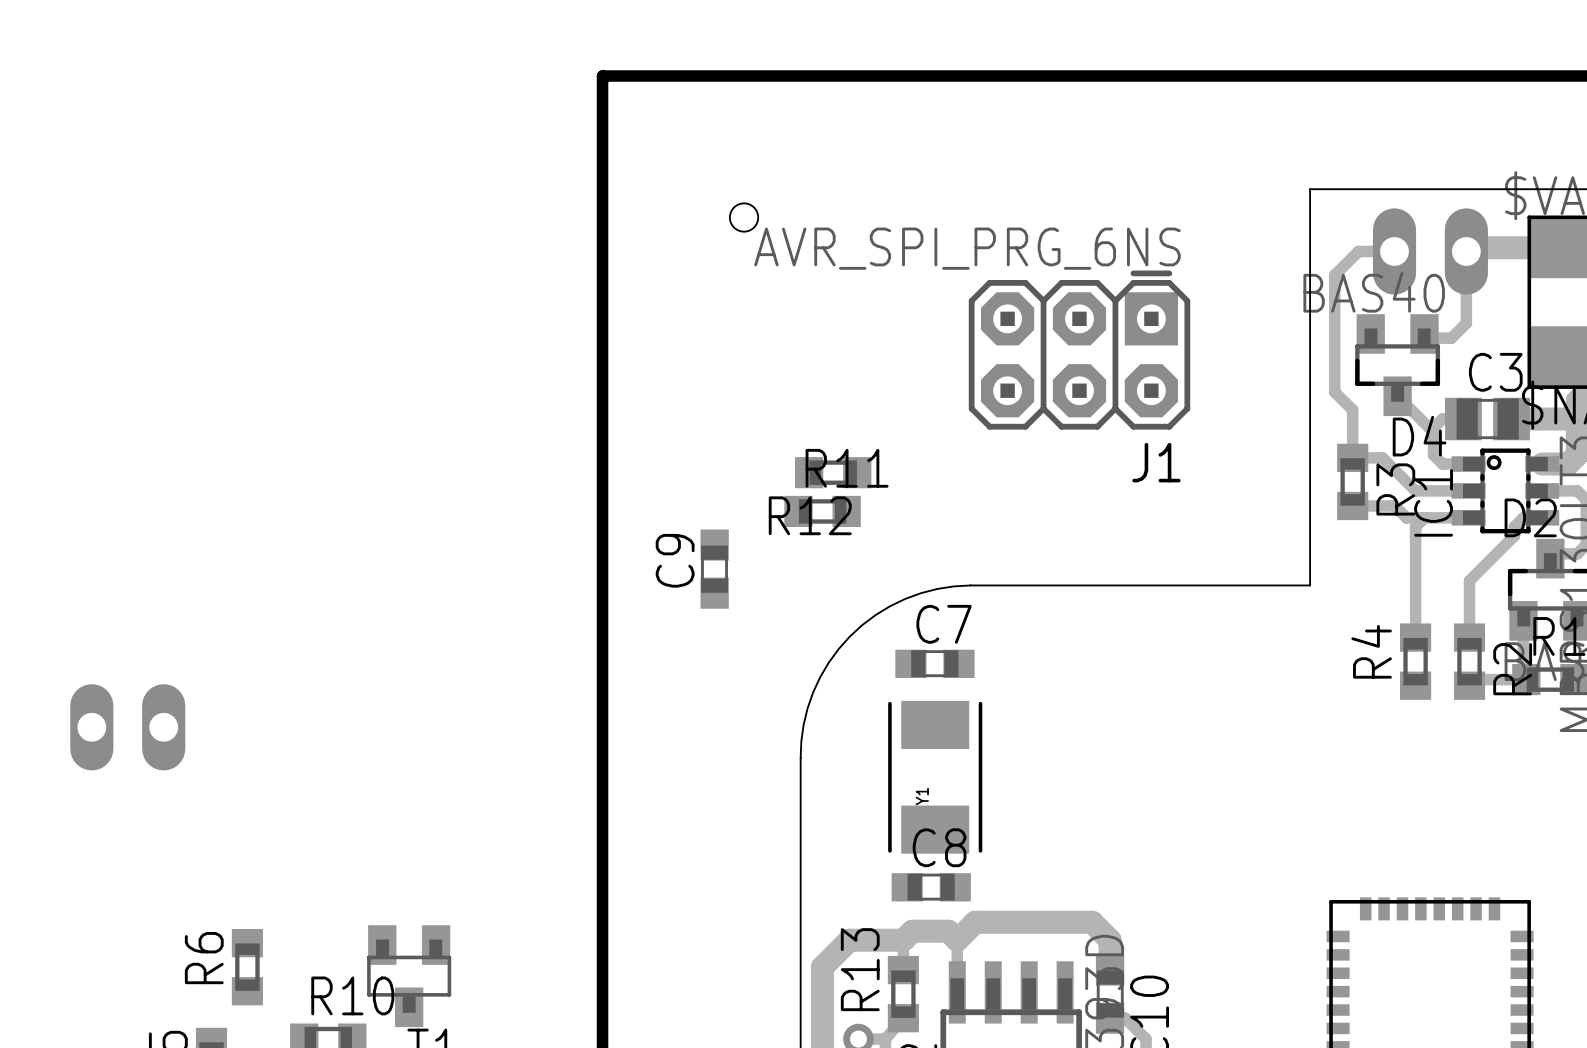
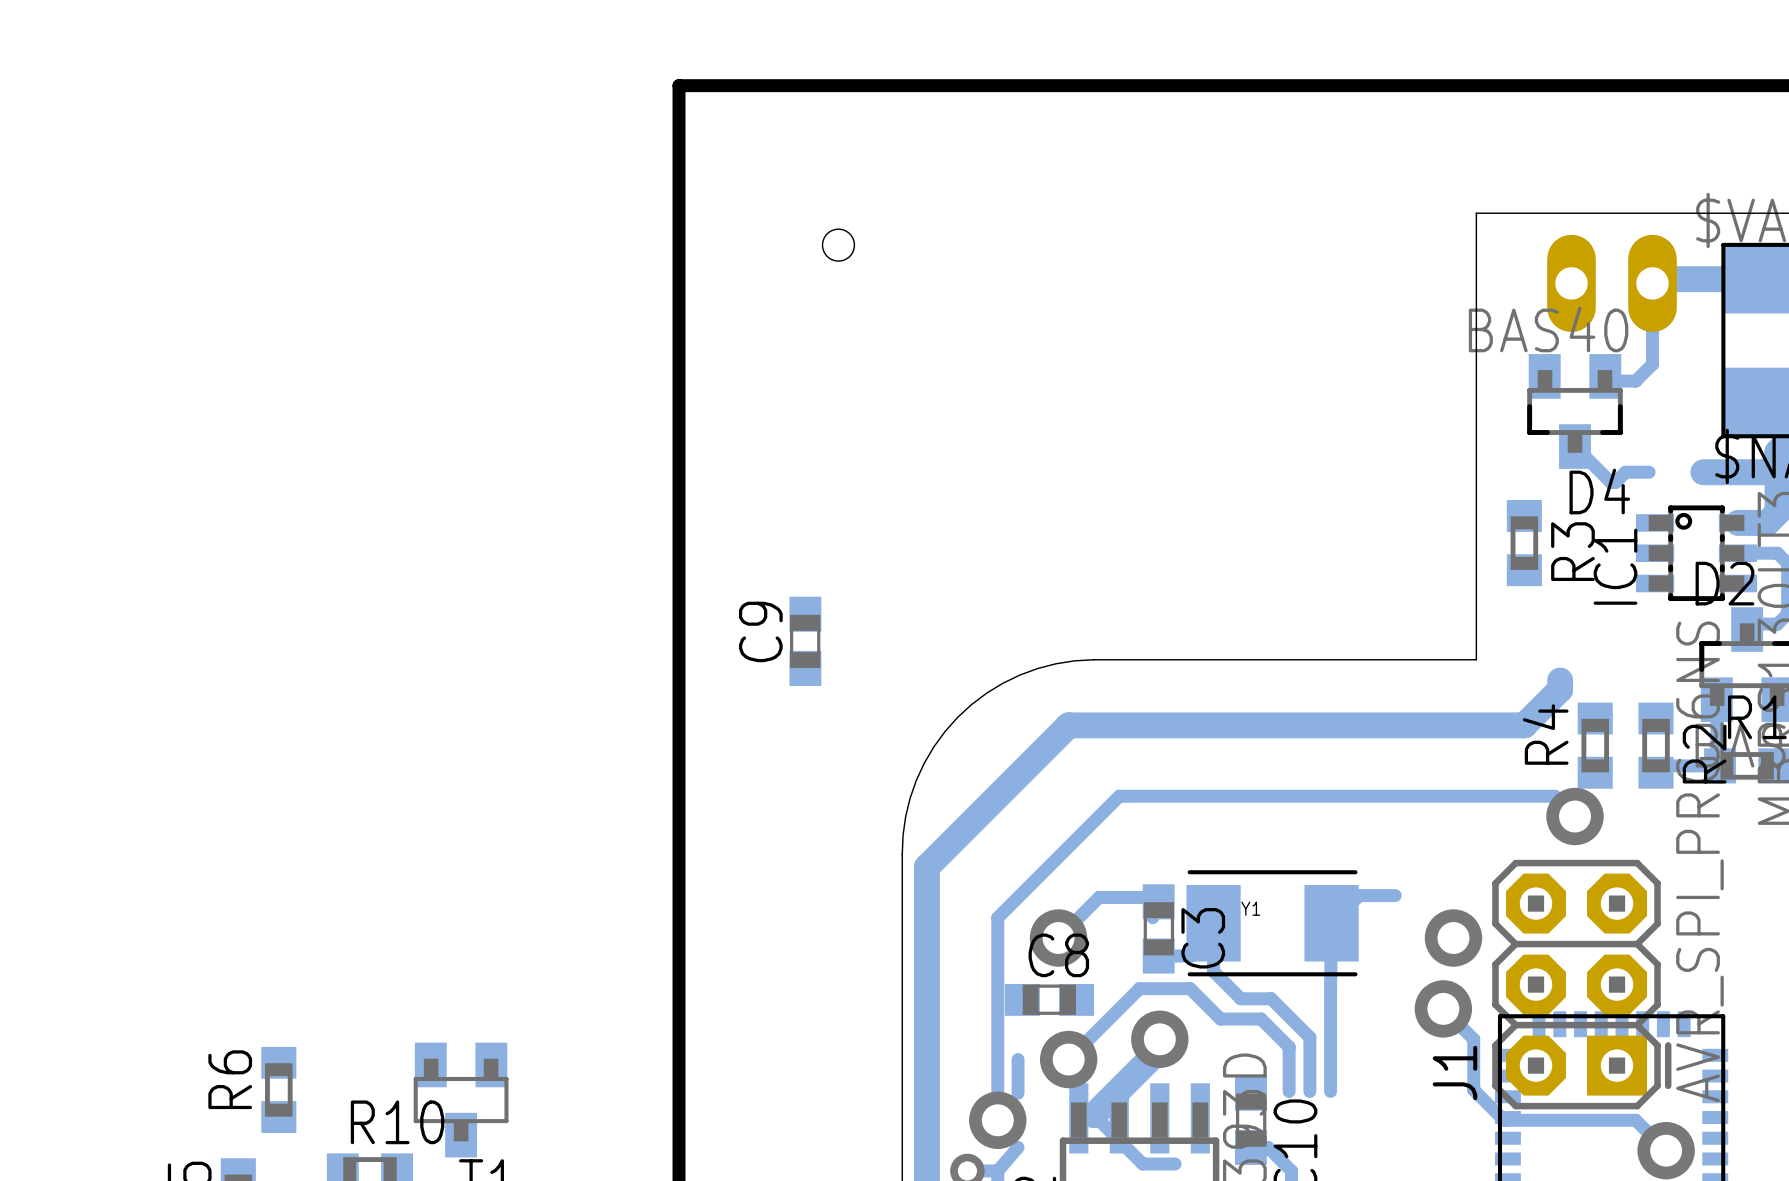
track: (1394, 251) (1358, 251) (1334, 275) (1334, 392) (1352, 410) (1352, 457) (1382, 457) (1415, 490) (1468, 490) -> none
J1 rotation: 0° (1079, 350) -> 90° clockwise (1581, 984)
J1 position: (1079, 350) -> (1581, 984)
C3 name position: C3 (1495, 372) -> C3 (1203, 938)
C3 footprint: [1445, 397, 1530, 441] -> [1142, 884, 1175, 974]
track: (1433, 428) (1433, 454) (1442, 464) (1468, 464) -> none
R12: (833, 472) -> none
track: (1352, 505) (1394, 505) (1406, 517) (1468, 517) -> none
R11: (822, 511) -> none
track: (1424, 517) (1415, 526) (1415, 637) -> none
track: (1542, 517) (1523, 517) (1514, 526) (1514, 535) (1469, 580) (1469, 637) -> none
C7: (934, 663) -> none
track: none -> (1574, 816) (1554, 796) (1119, 796) (997, 917) (997, 1120)
via: none -> (1574, 816)
part: (127, 727) -> none
Y1 rotation: 0° (935, 777) -> 90° clockwise (1272, 923)
Y1 position: (935, 777) -> (1272, 923)
track: none -> (1395, 895) (1359, 895) (1331, 923) (1330, 1091)
track: none -> (1152, 917) (1158, 901) (1144, 897) (1099, 897) (1058, 938)
via: none -> (1058, 938)
via: none -> (1453, 938)
track: none -> (1158, 956) (1190, 956) (1213, 923) (1213, 971) (1240, 998) (1271, 998) (1309, 1037) (1309, 1091)
track: none -> (1443, 1008) (1473, 1039) (1473, 1089) (1504, 1120) (1635, 1120) (1666, 1150)
via: none -> (1443, 1008)
track: none -> (1159, 1039) (1159, 1049) (1093, 1115) (1142, 1164) (1175, 1164)
via: none -> (1159, 1039)
track: none -> (1068, 1059) (1139, 988) (1190, 988) (1220, 1019) (1261, 1019) (1289, 1047) (1289, 1091)
via: none -> (1068, 1059)
track: (822, 967) (849, 940) (903, 940) (912, 931) (948, 931) (957, 940) (975, 922) (1092, 922) (1110, 940) (1110, 970) -> (926, 1089) (926, 867) (1068, 725) (1524, 725) (1560, 689) (1560, 680)
via: none -> (997, 1120)
R13: (903, 994) -> none
via: none -> (1666, 1150)

